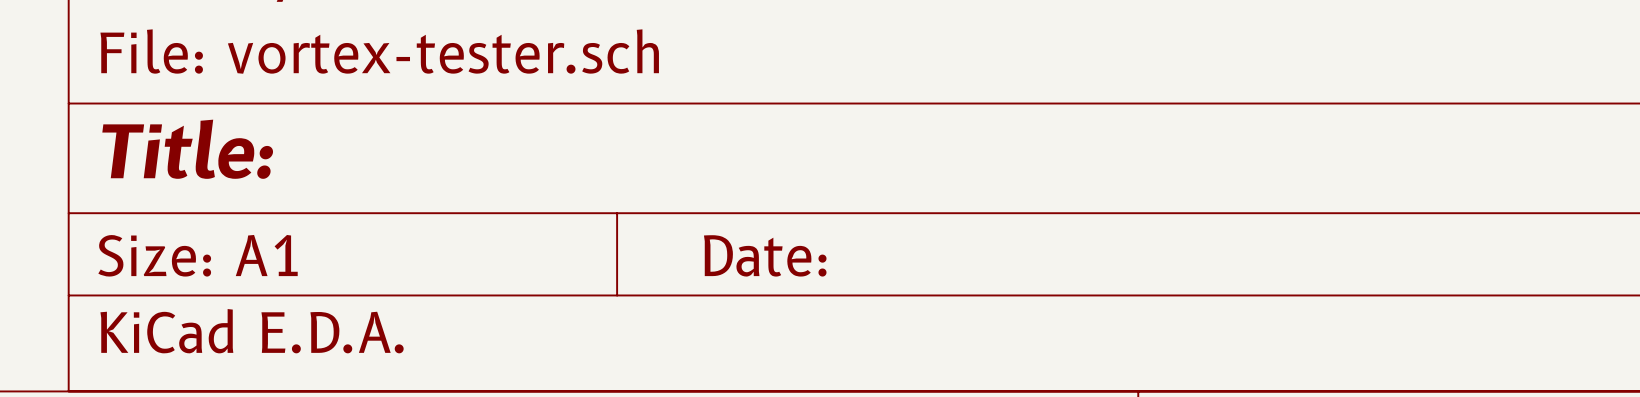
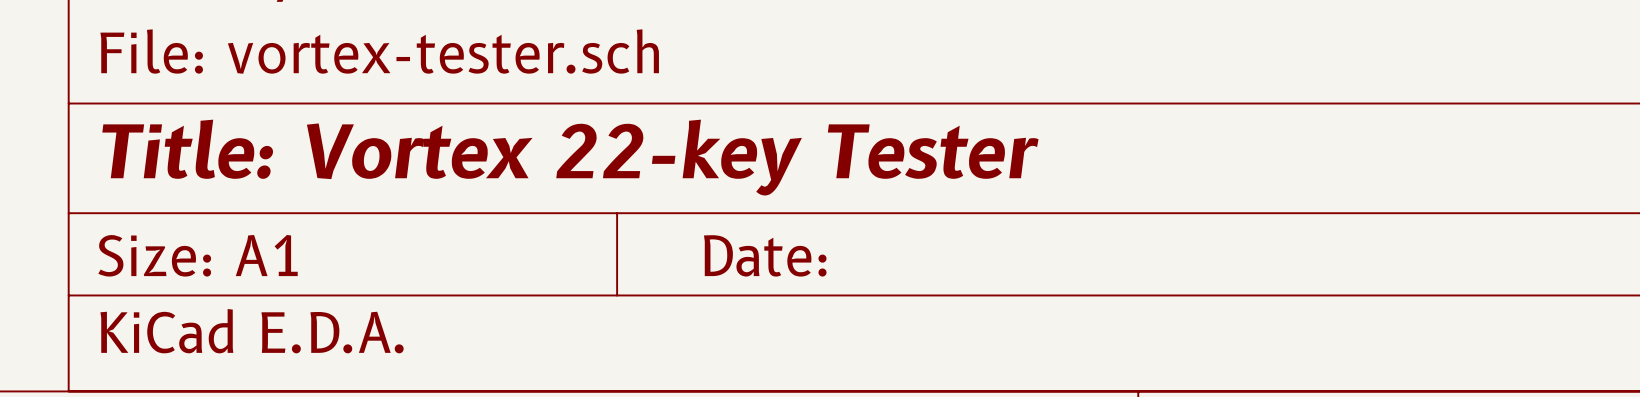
title block: Title: (187, 149) -> Title: Vortex 22-key Tester (570, 157)

